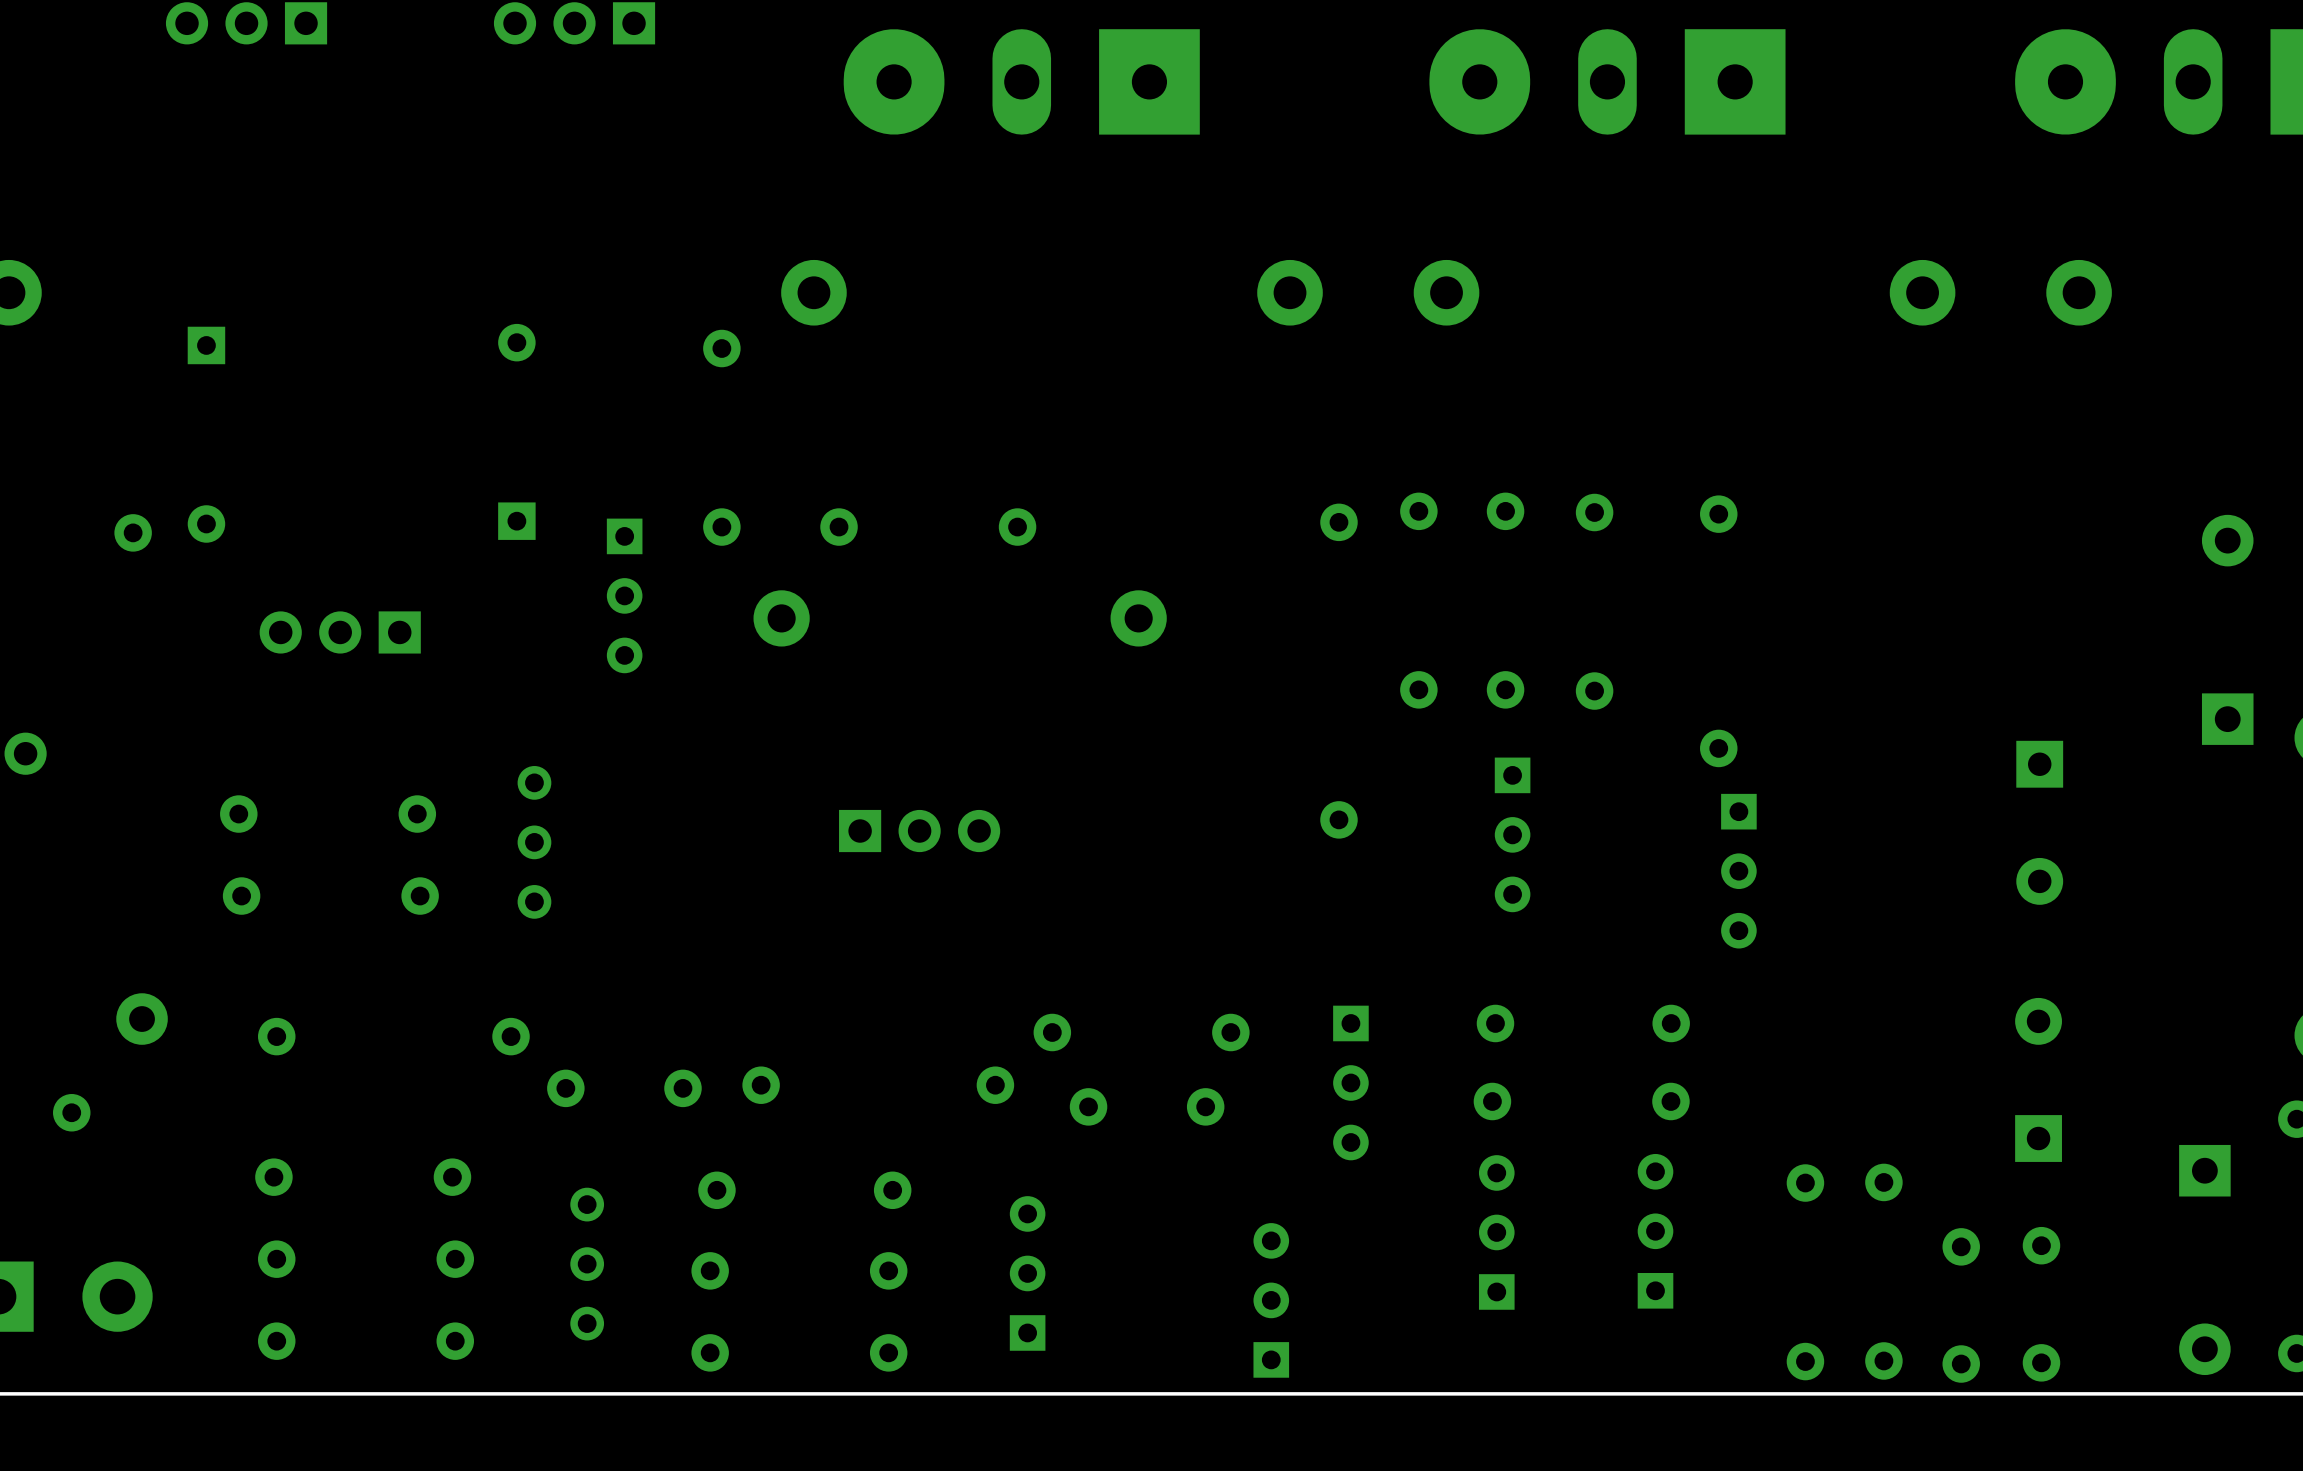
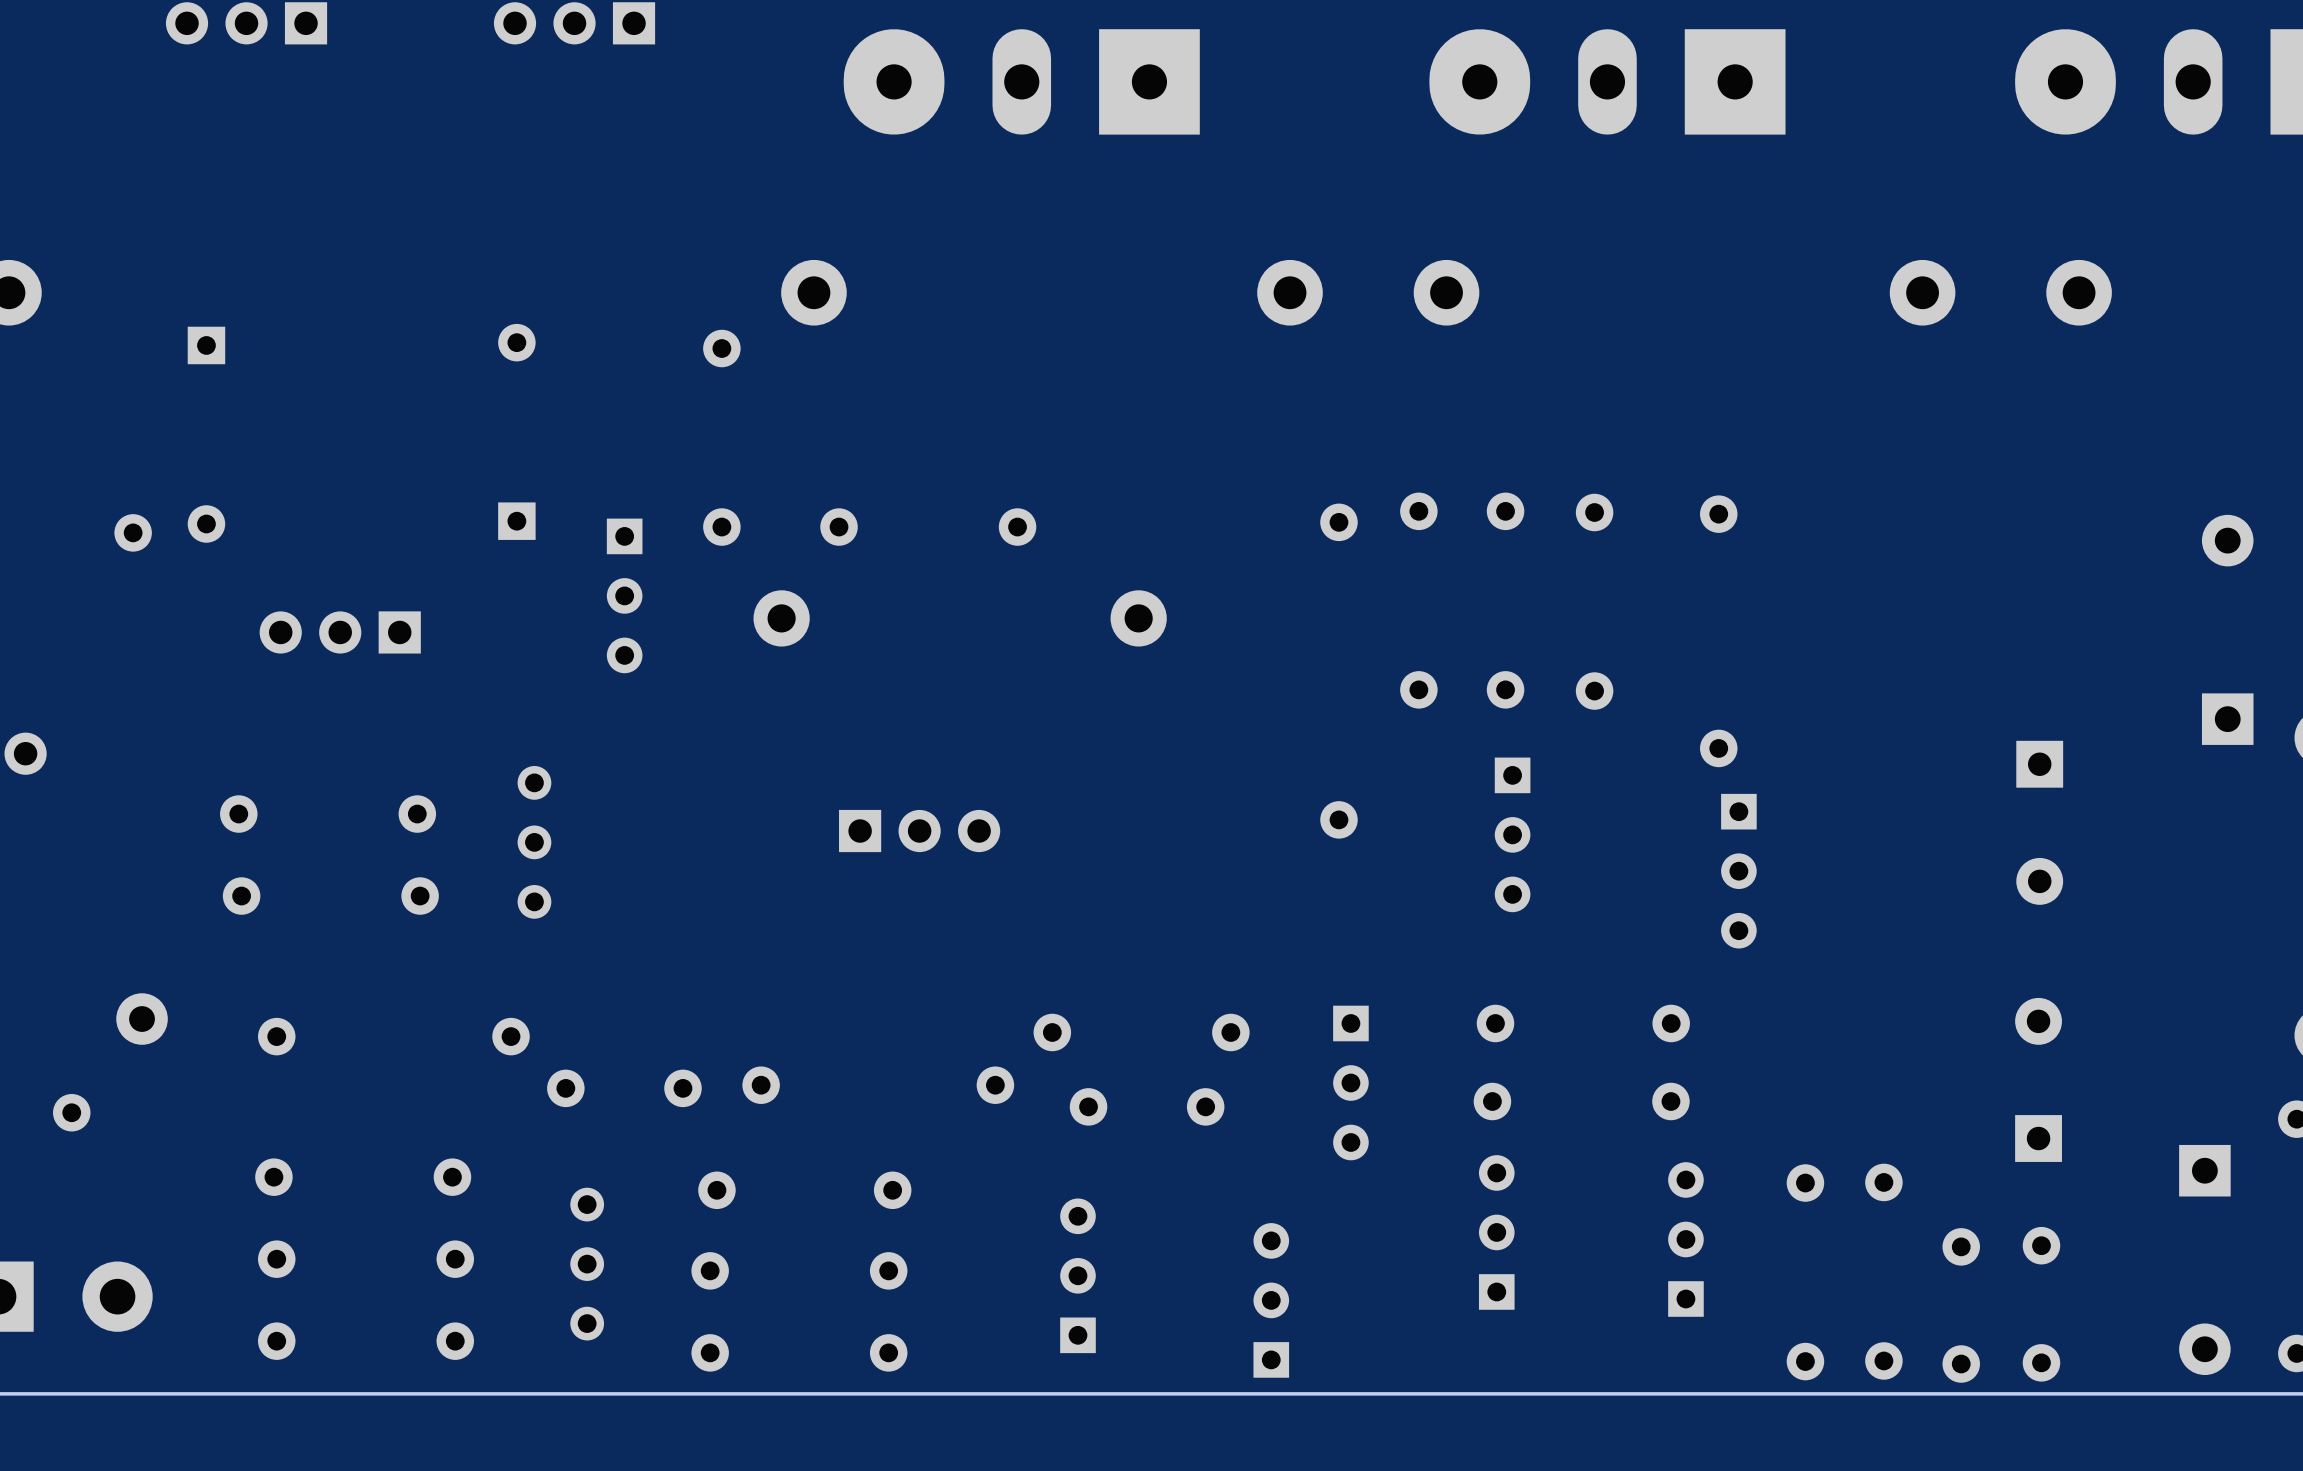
part position: (1655, 1231) -> (1685, 1239)
part position: (1027, 1273) -> (1077, 1275)

